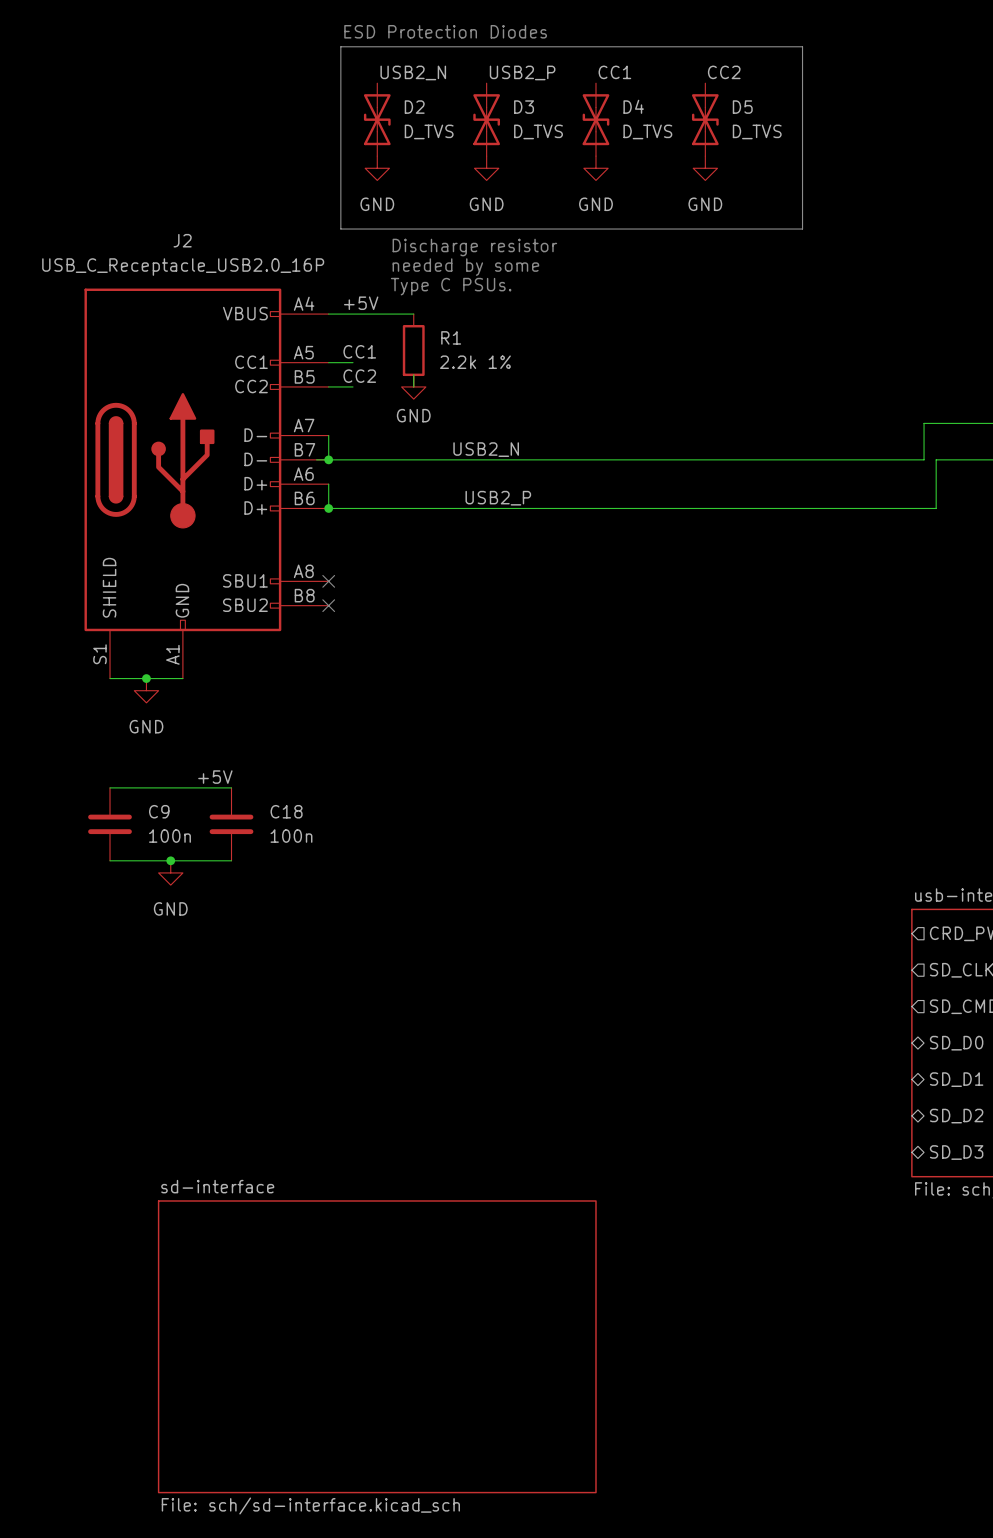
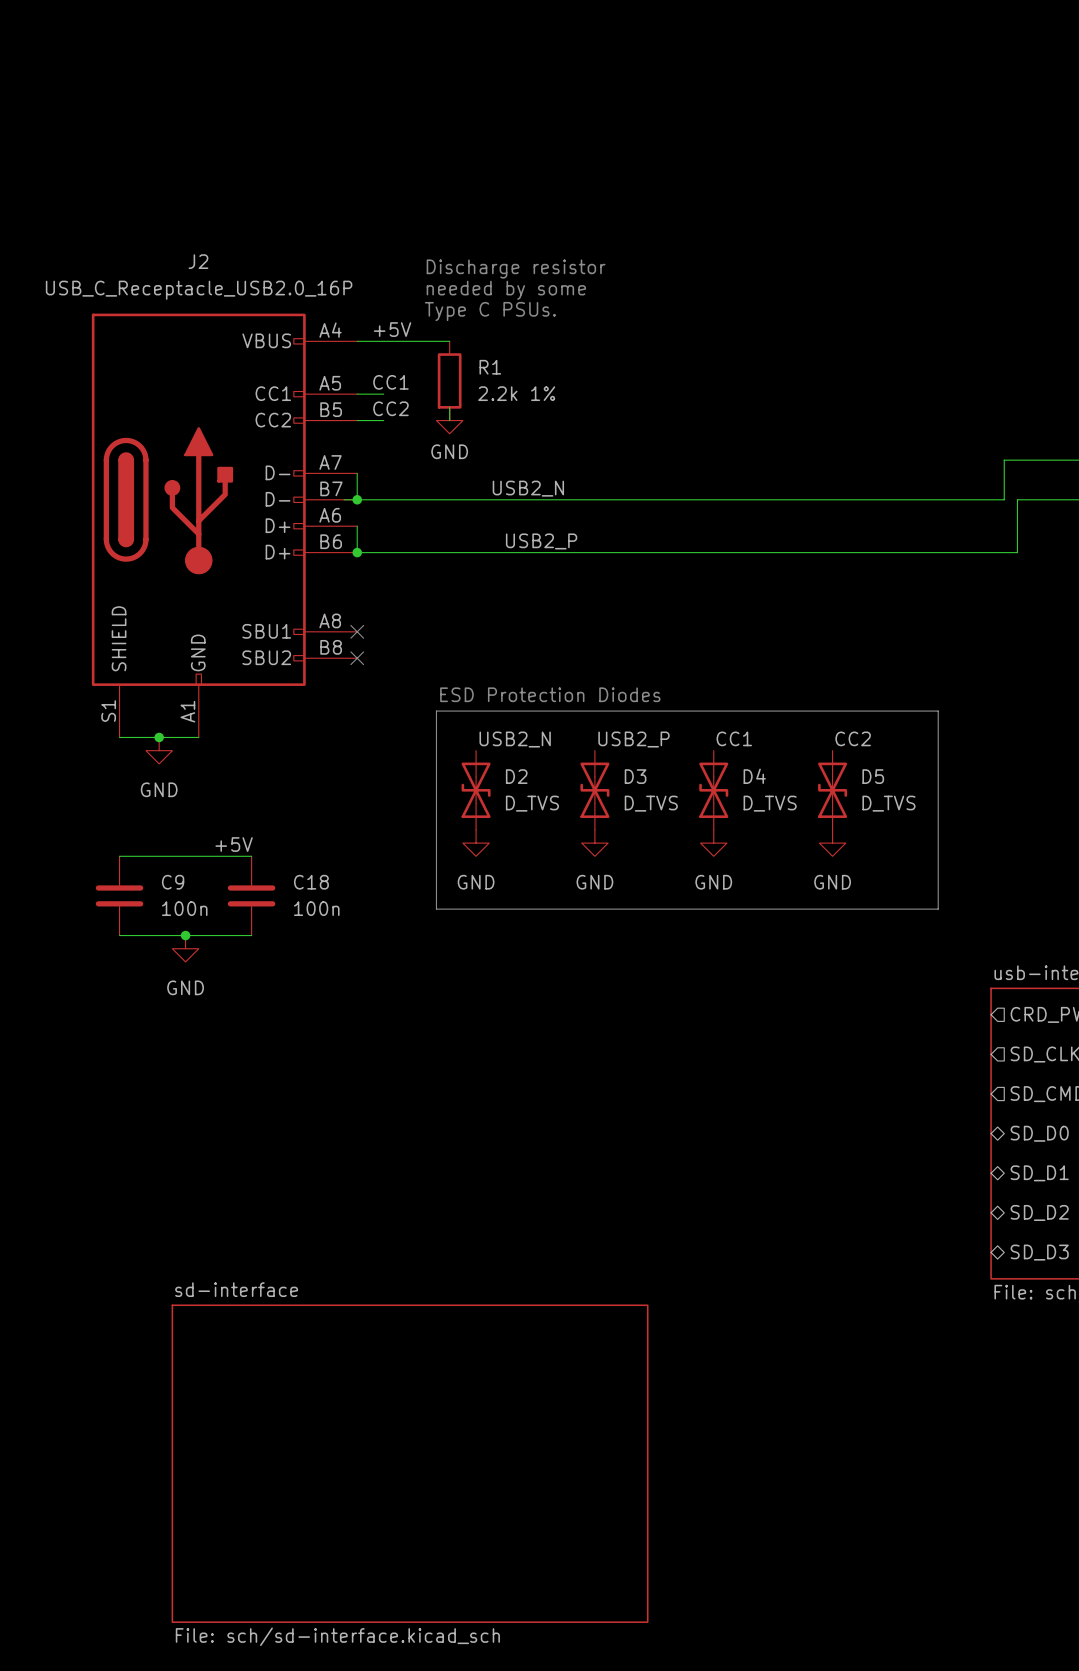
text: ESD Protection Diodes (445, 31) -> none
line: (340, 46) (802, 46) (802, 229) (340, 229) (340, 46) -> none
label: USB2_N (413, 72) -> none
label: USB2_P (522, 72) -> none
label: CC1 (614, 72) -> none
label: CC2 (724, 72) -> none
D2 position: (377, 119) -> (476, 790)
D3 position: (486, 119) -> (594, 790)
D4 position: (595, 119) -> (713, 790)
D5 position: (705, 119) -> (832, 790)
power symbol: GND (377, 168) -> none
power symbol: GND (486, 168) -> none
power symbol: GND (595, 168) -> none
power symbol: GND (705, 168) -> none
text: none -> ESD Protection Diodes (550, 694)
line: none -> (436, 711) (938, 711) (938, 909) (436, 909) (436, 711)
label: none -> CC1 (734, 738)
label: none -> CC2 (853, 738)
label: none -> USB2_N (515, 739)
label: none -> USB2_P (634, 739)
power symbol: none -> GND (476, 843)
power symbol: none -> GND (594, 843)
power symbol: none -> GND (713, 843)
power symbol: none -> GND (832, 843)

